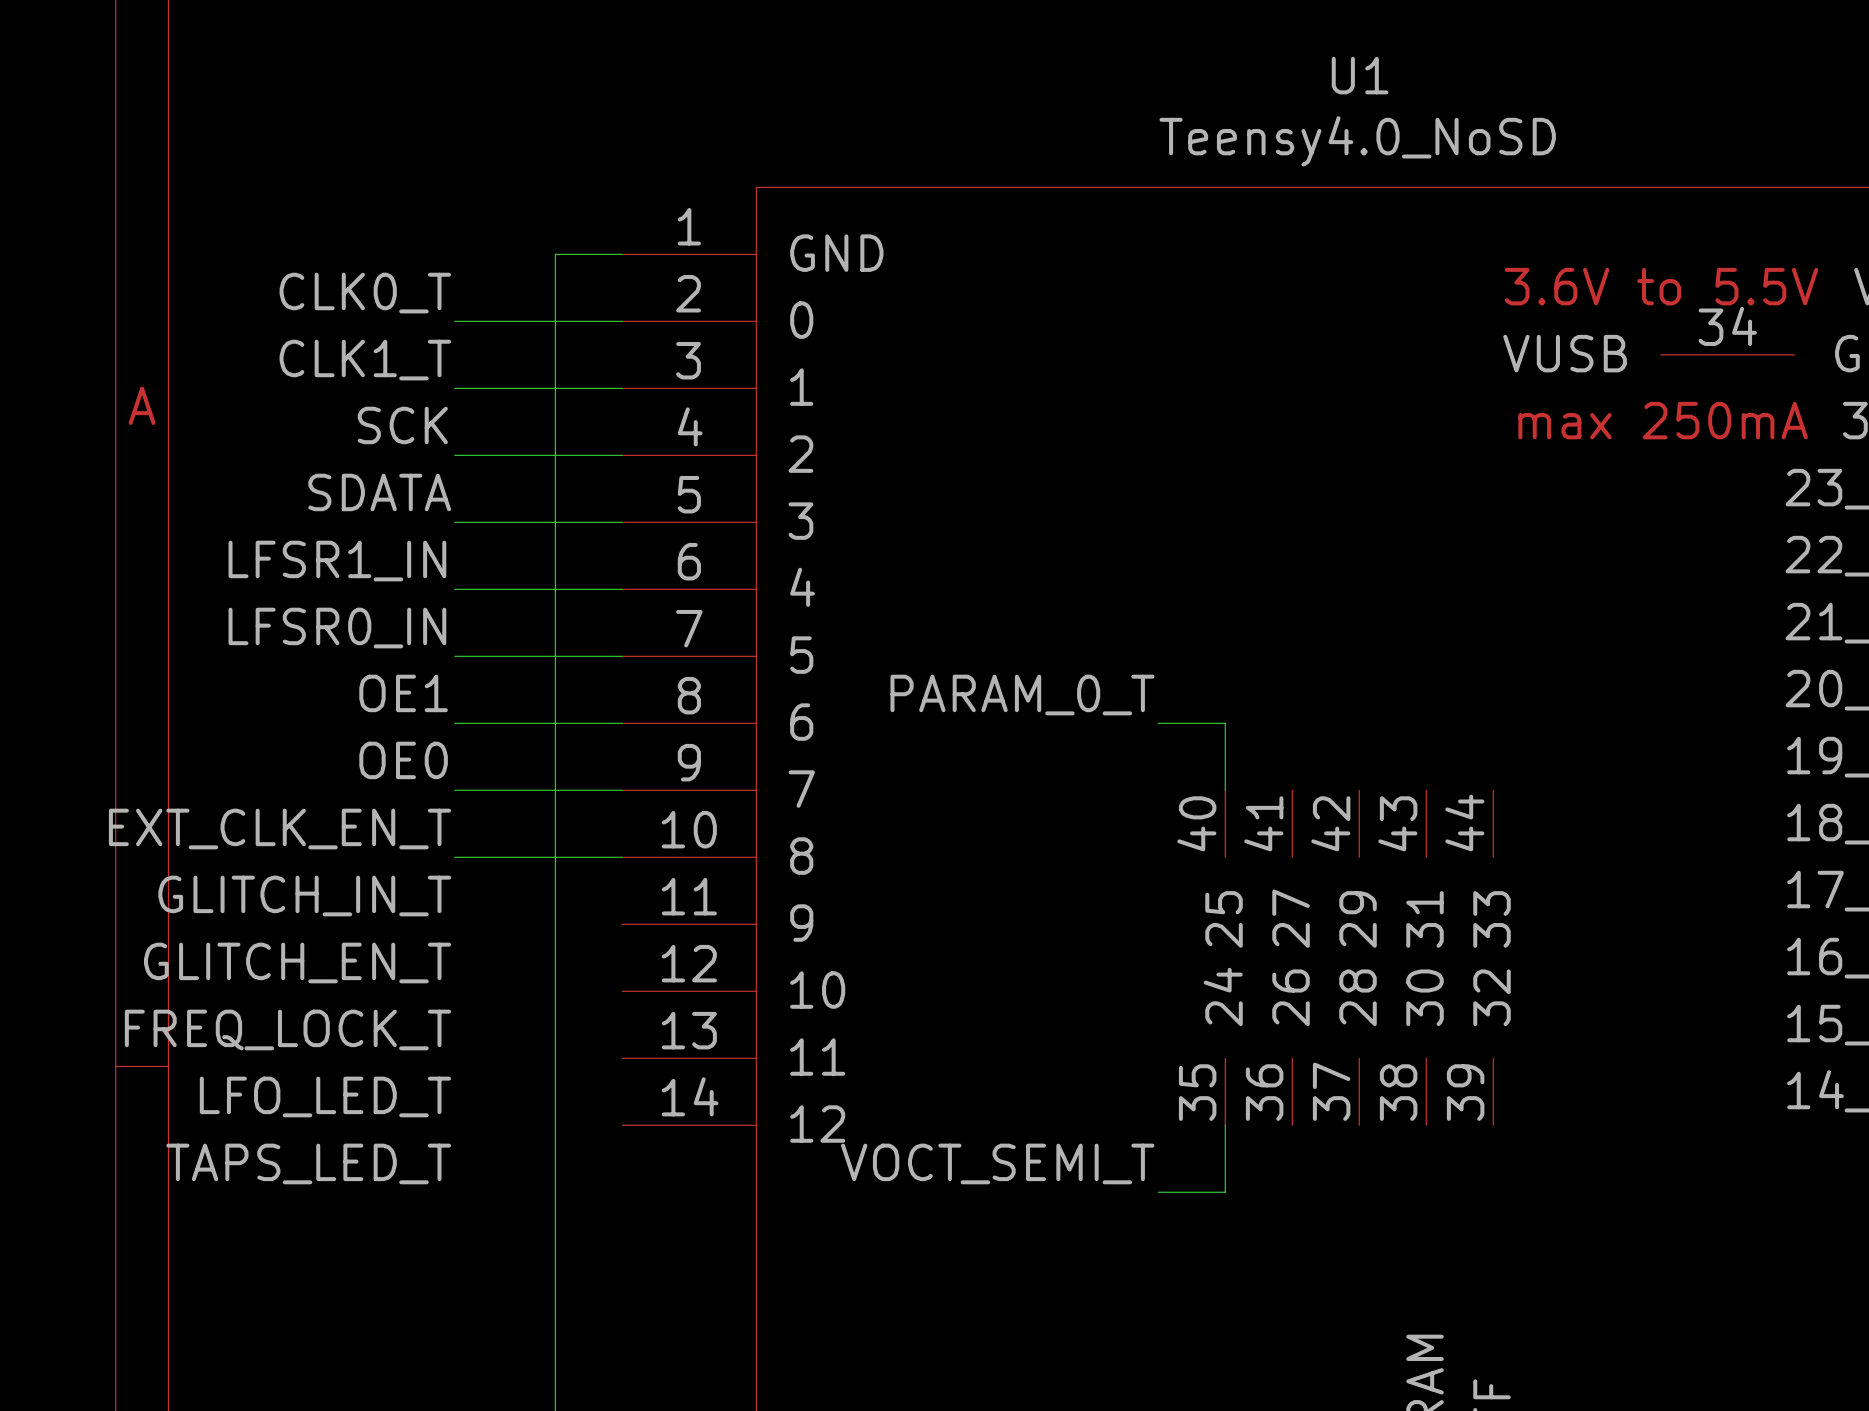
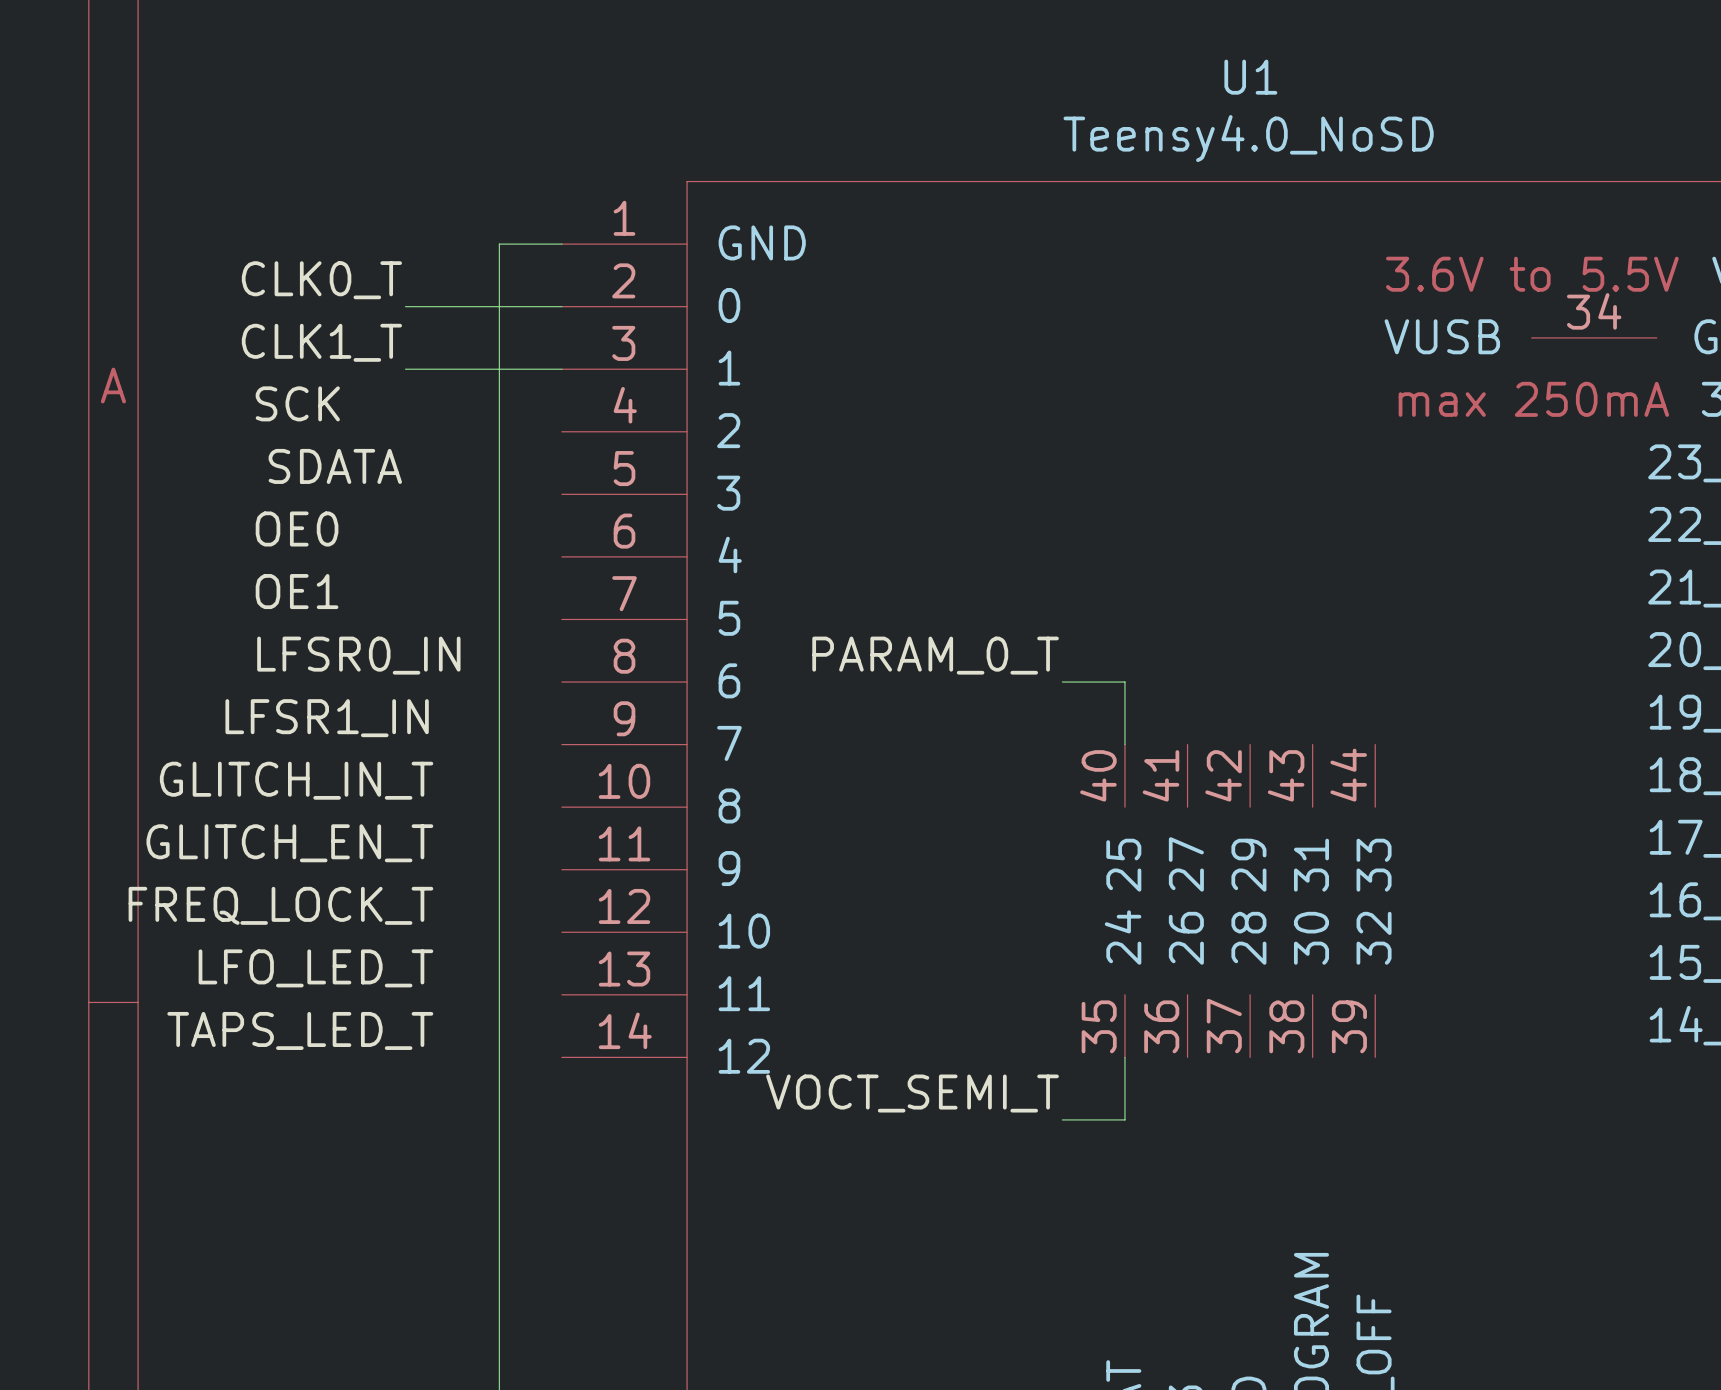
label position: SCK (402, 425) -> SCK (297, 403)
wire: (454, 455) (622, 455) -> none
wire: (454, 522) (622, 522) -> none
label position: LFSR1_IN (337, 561) -> LFSR1_IN (327, 718)
wire: (454, 589) (622, 589) -> none
label position: LFSR0_IN (337, 628) -> LFSR0_IN (358, 655)
wire: (454, 656) (622, 656) -> none
label position: OE1 (403, 693) -> OE1 (297, 591)
wire: (454, 723) (622, 723) -> none
label position: OE0 (403, 760) -> OE0 (297, 528)
wire: (454, 790) (622, 790) -> none
label: EXT_CLK_EN_T (279, 829) -> none
wire: (454, 857) (622, 857) -> none
label position: GLITCH_IN_T (304, 896) -> GLITCH_IN_T (296, 780)
label position: GLITCH_EN_T (297, 962) -> GLITCH_EN_T (289, 843)
label position: FREQ_LOCK_T (287, 1029) -> FREQ_LOCK_T (280, 905)
label position: LFO_LED_T (325, 1096) -> LFO_LED_T (315, 968)
label position: TAPS_LED_T (308, 1163) -> TAPS_LED_T (300, 1030)

